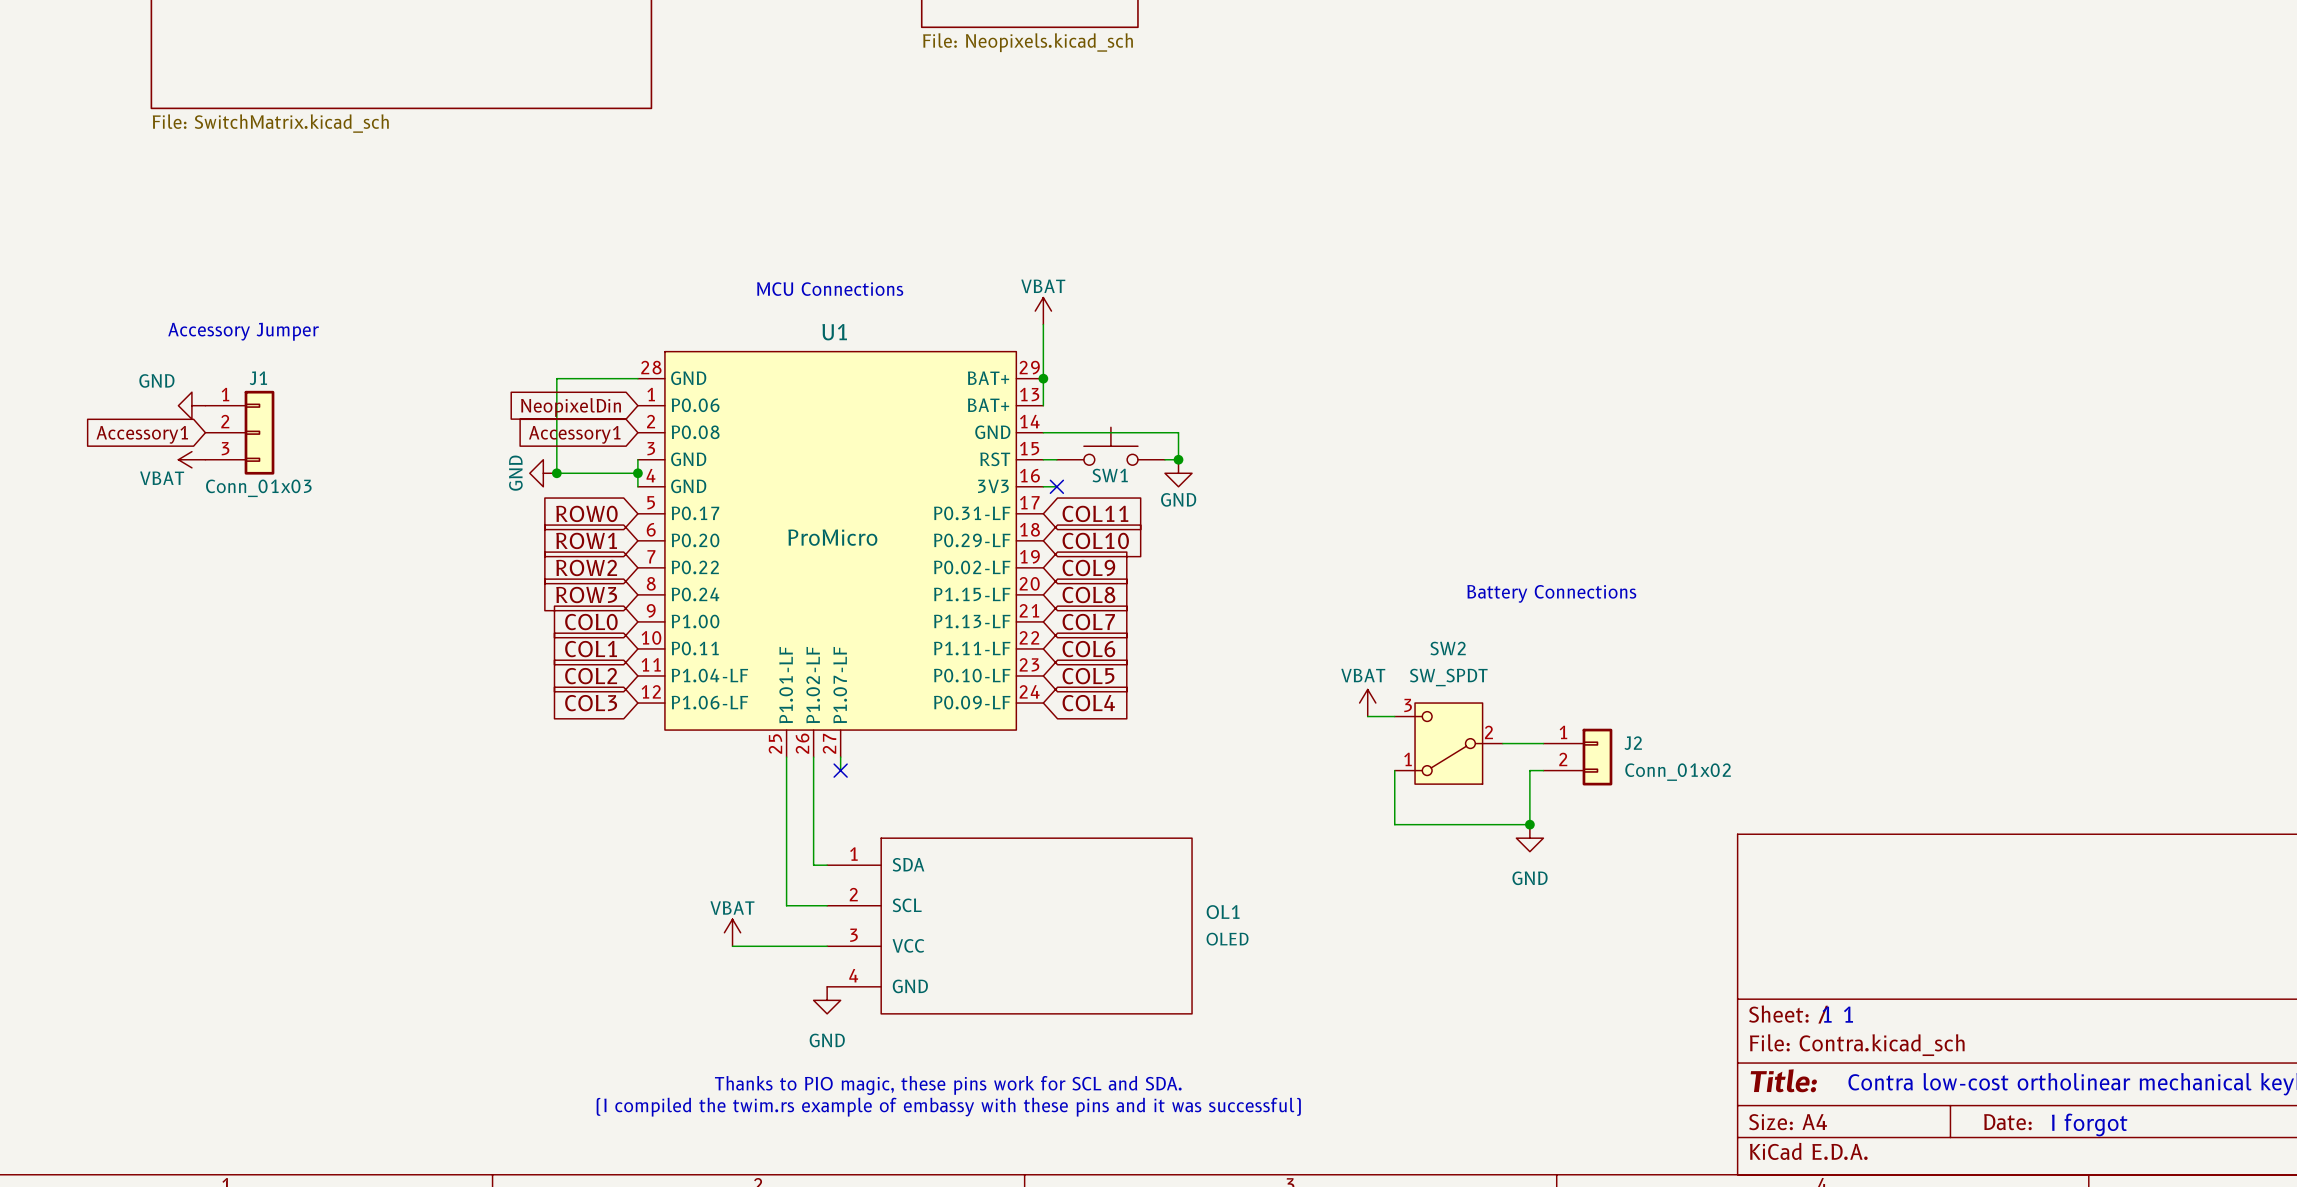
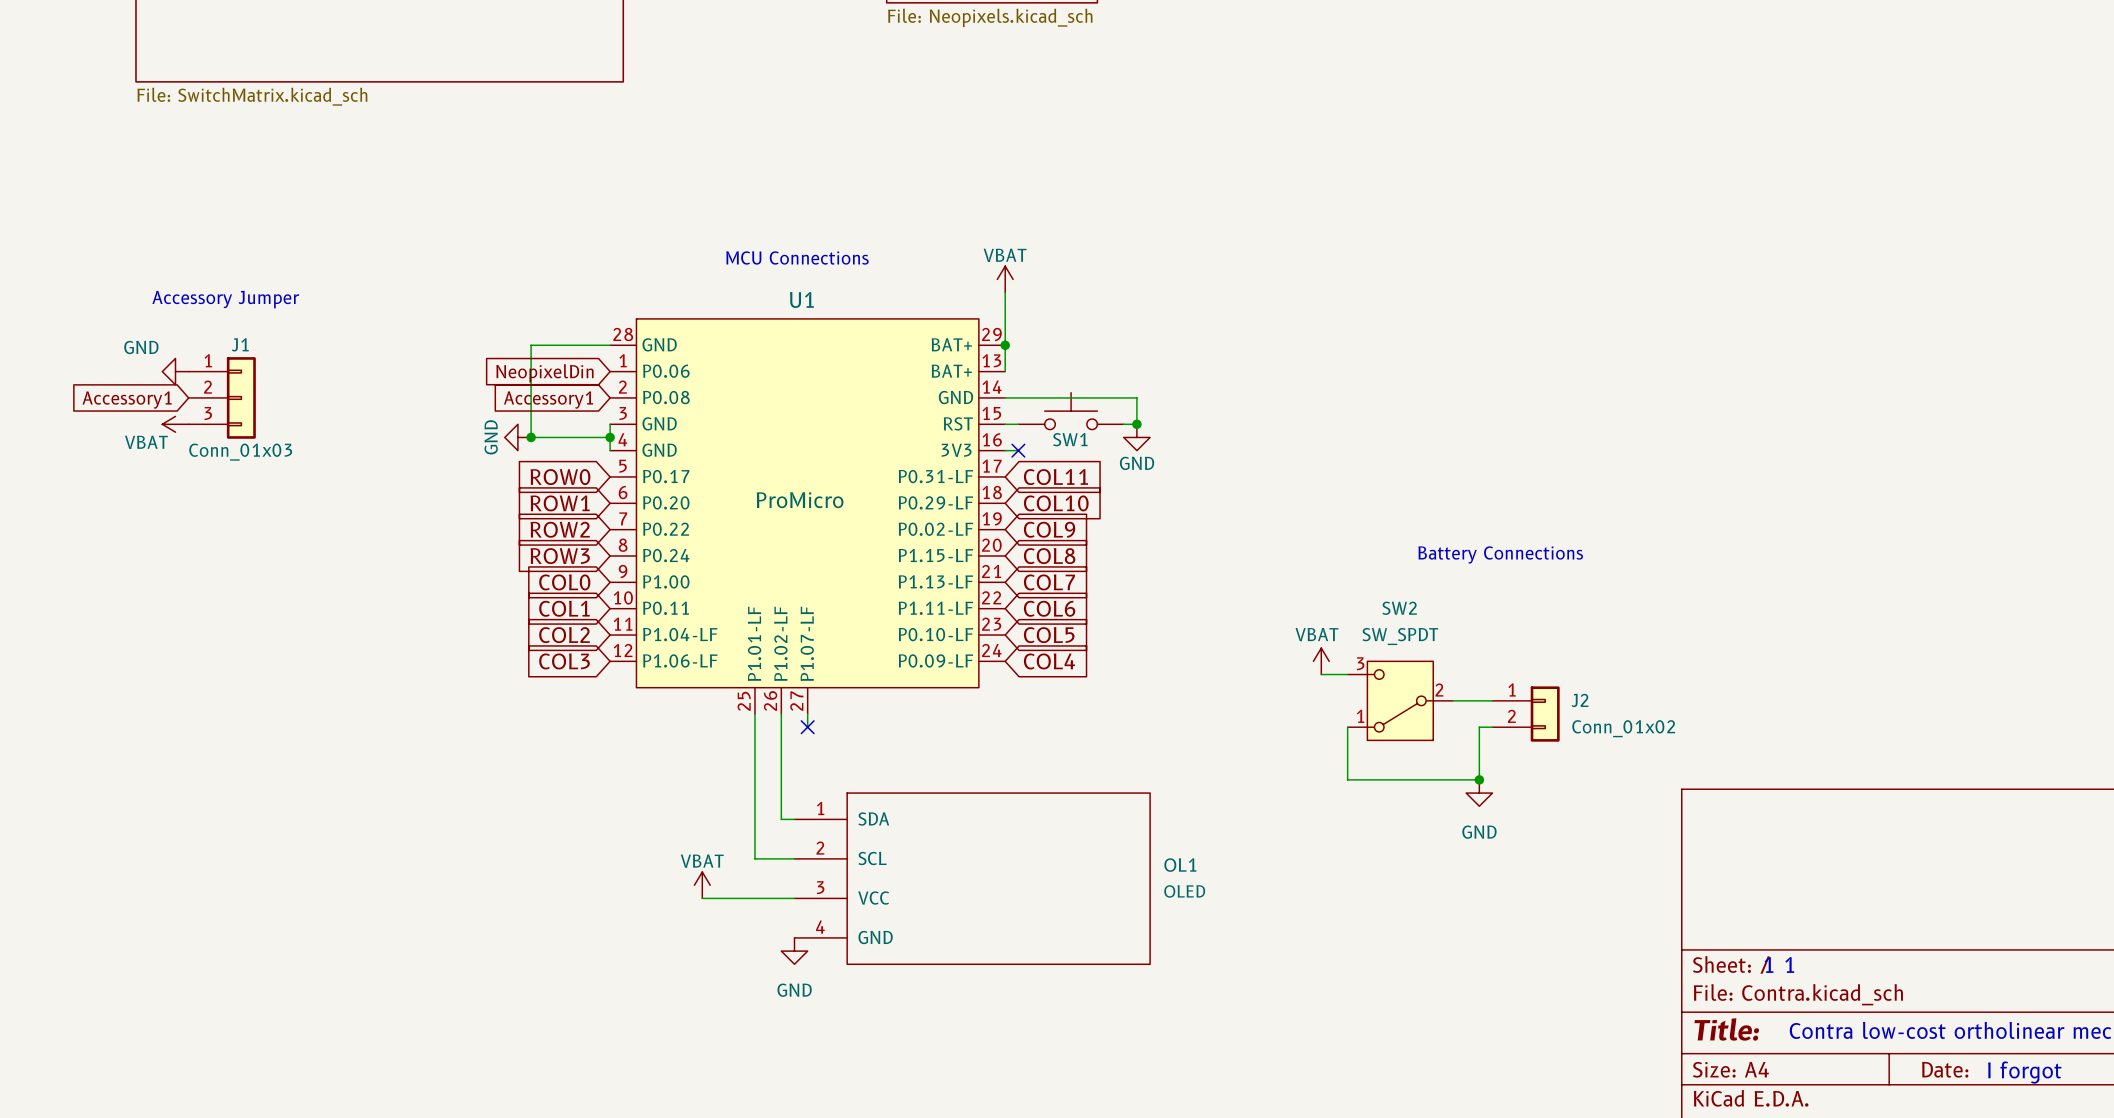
text: Thanks to PIO magic, these pins work for SCL and SDA. (948, 1085) -> none
text: (I compiled the twim.rs example of embassy with these pins and it was successful) (948, 1107) -> none

